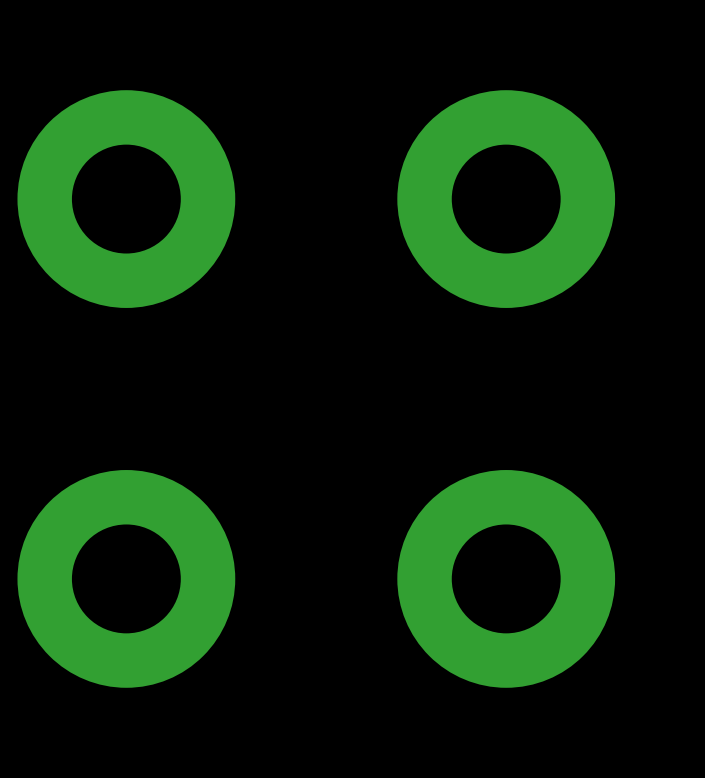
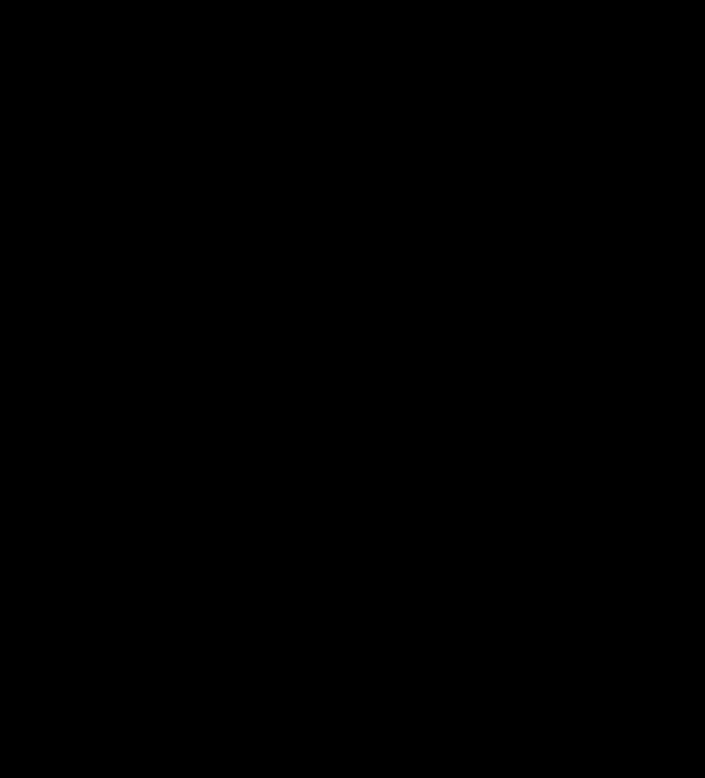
part: (126, 199) -> none
part: (506, 199) -> none
part: (126, 578) -> none
part: (506, 578) -> none

